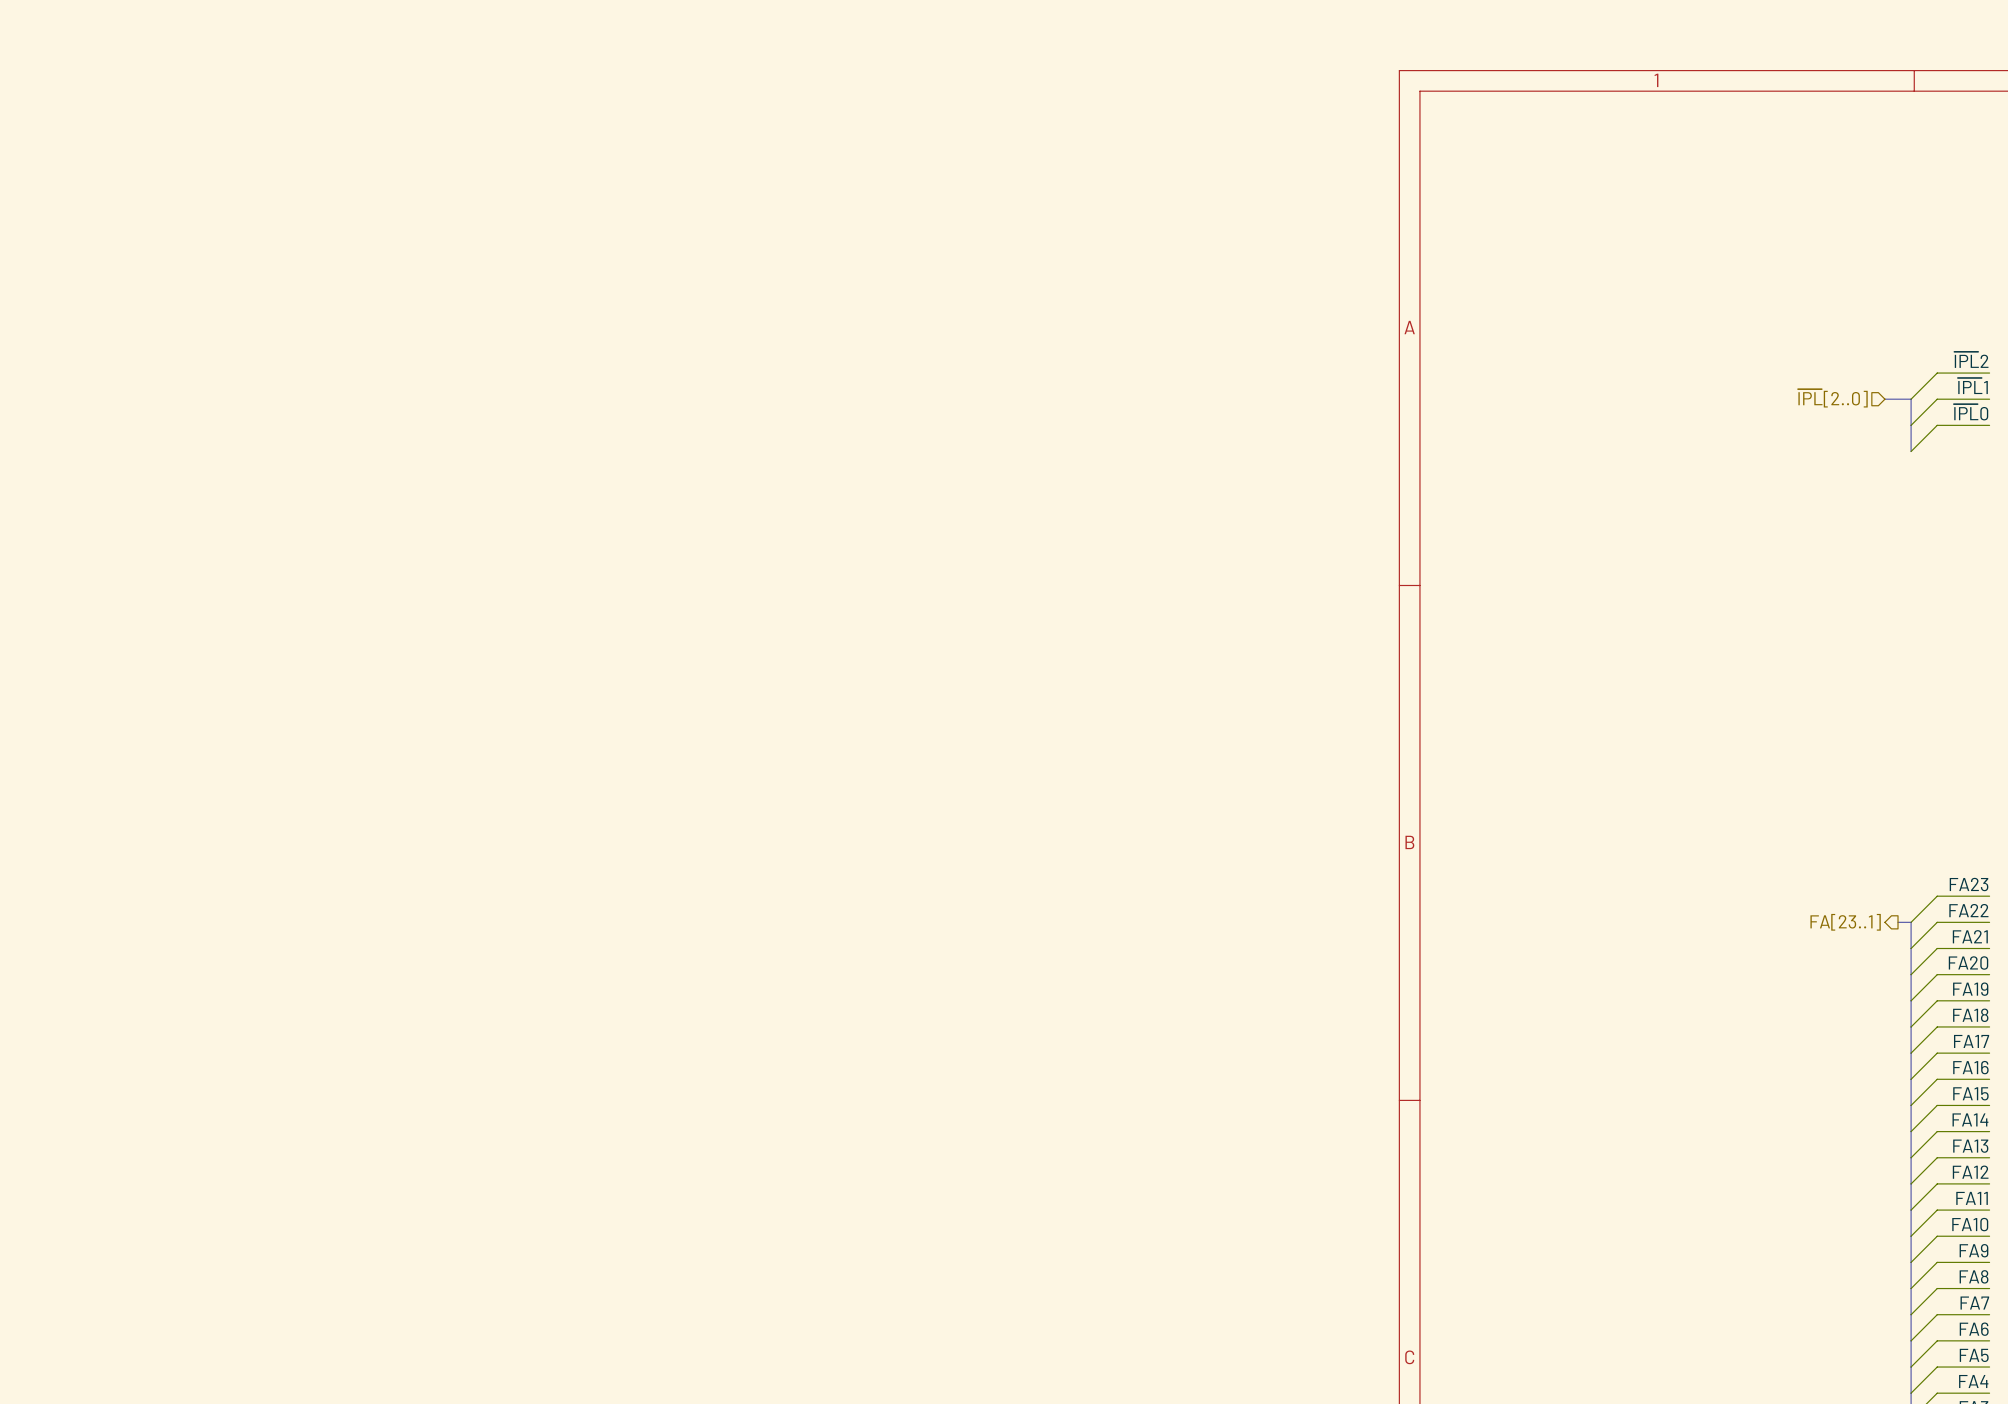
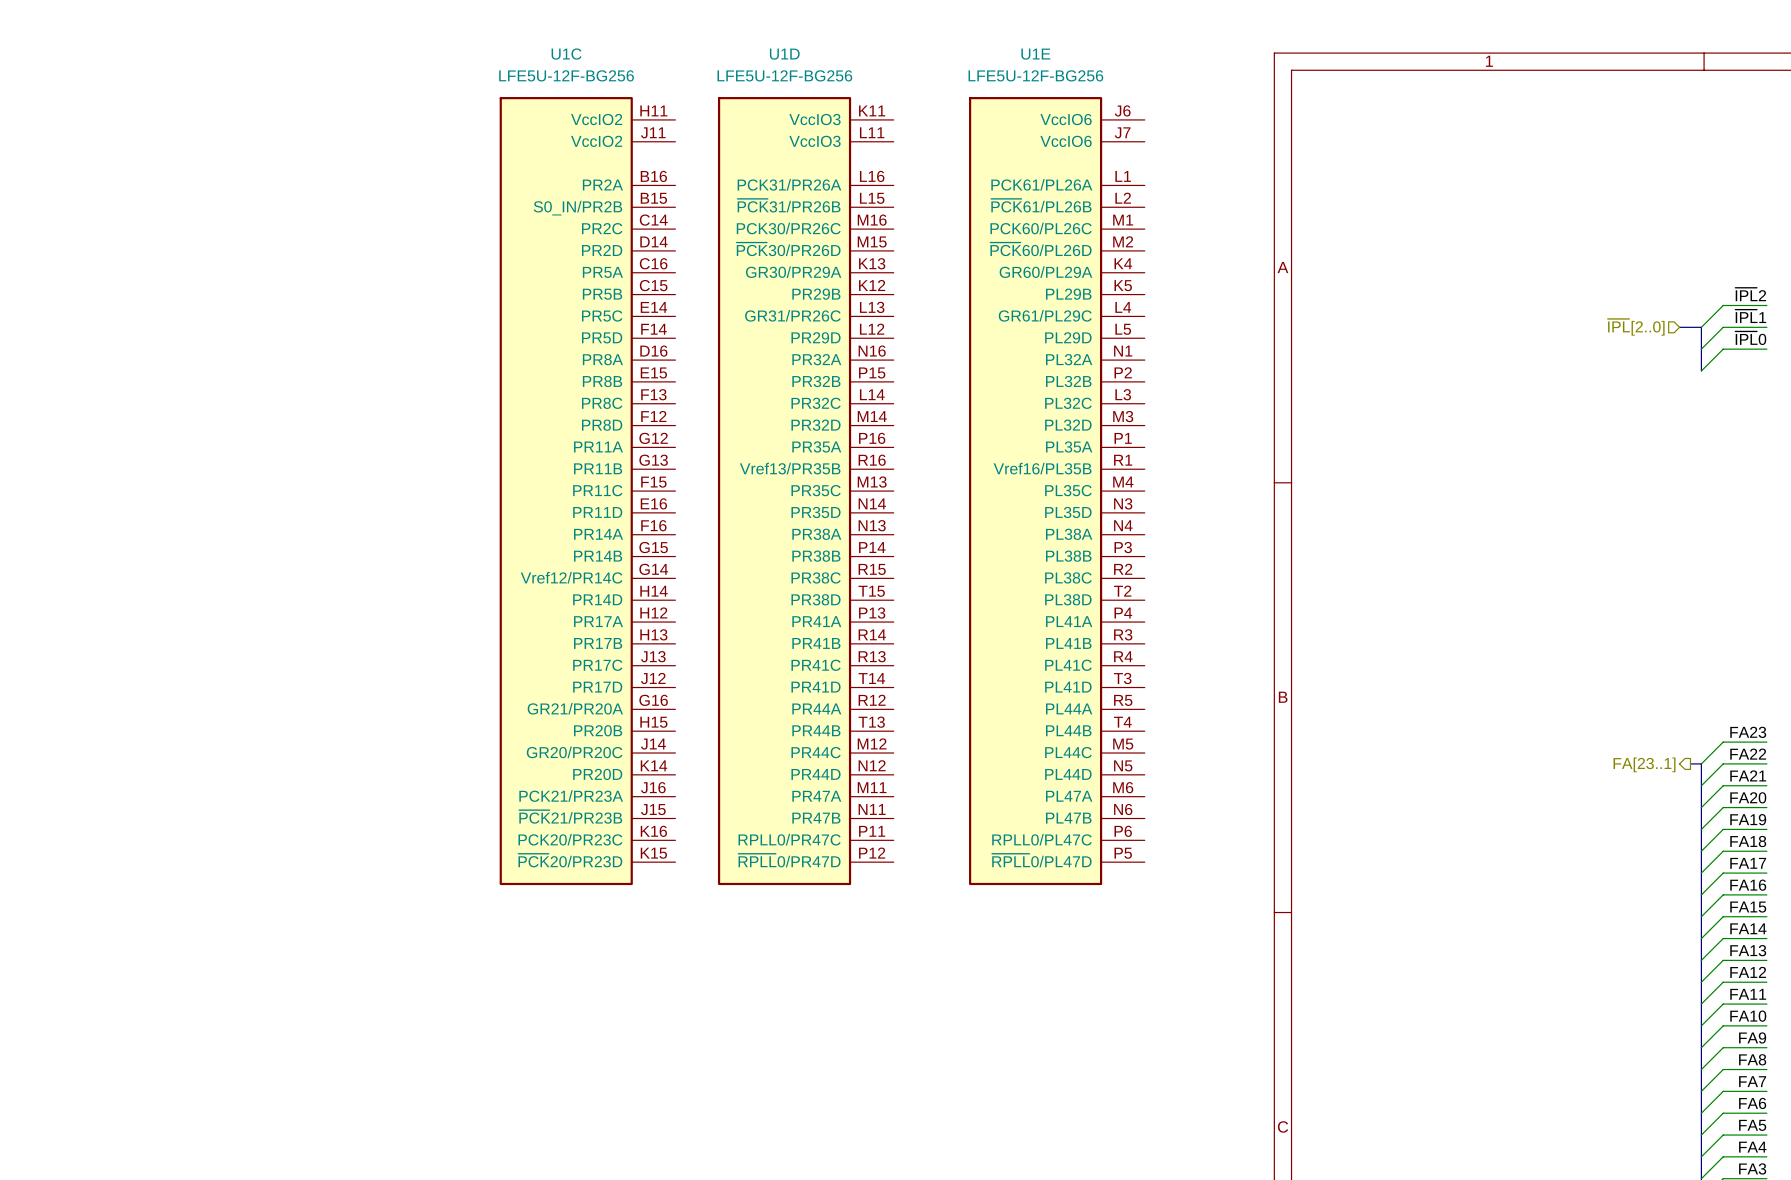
U1C: none -> LFE5U-12F-BG256 (587, 491)
U1D: none -> LFE5U-12F-BG256 (805, 491)
U1E: none -> LFE5U-12F-BG256 (1056, 491)

